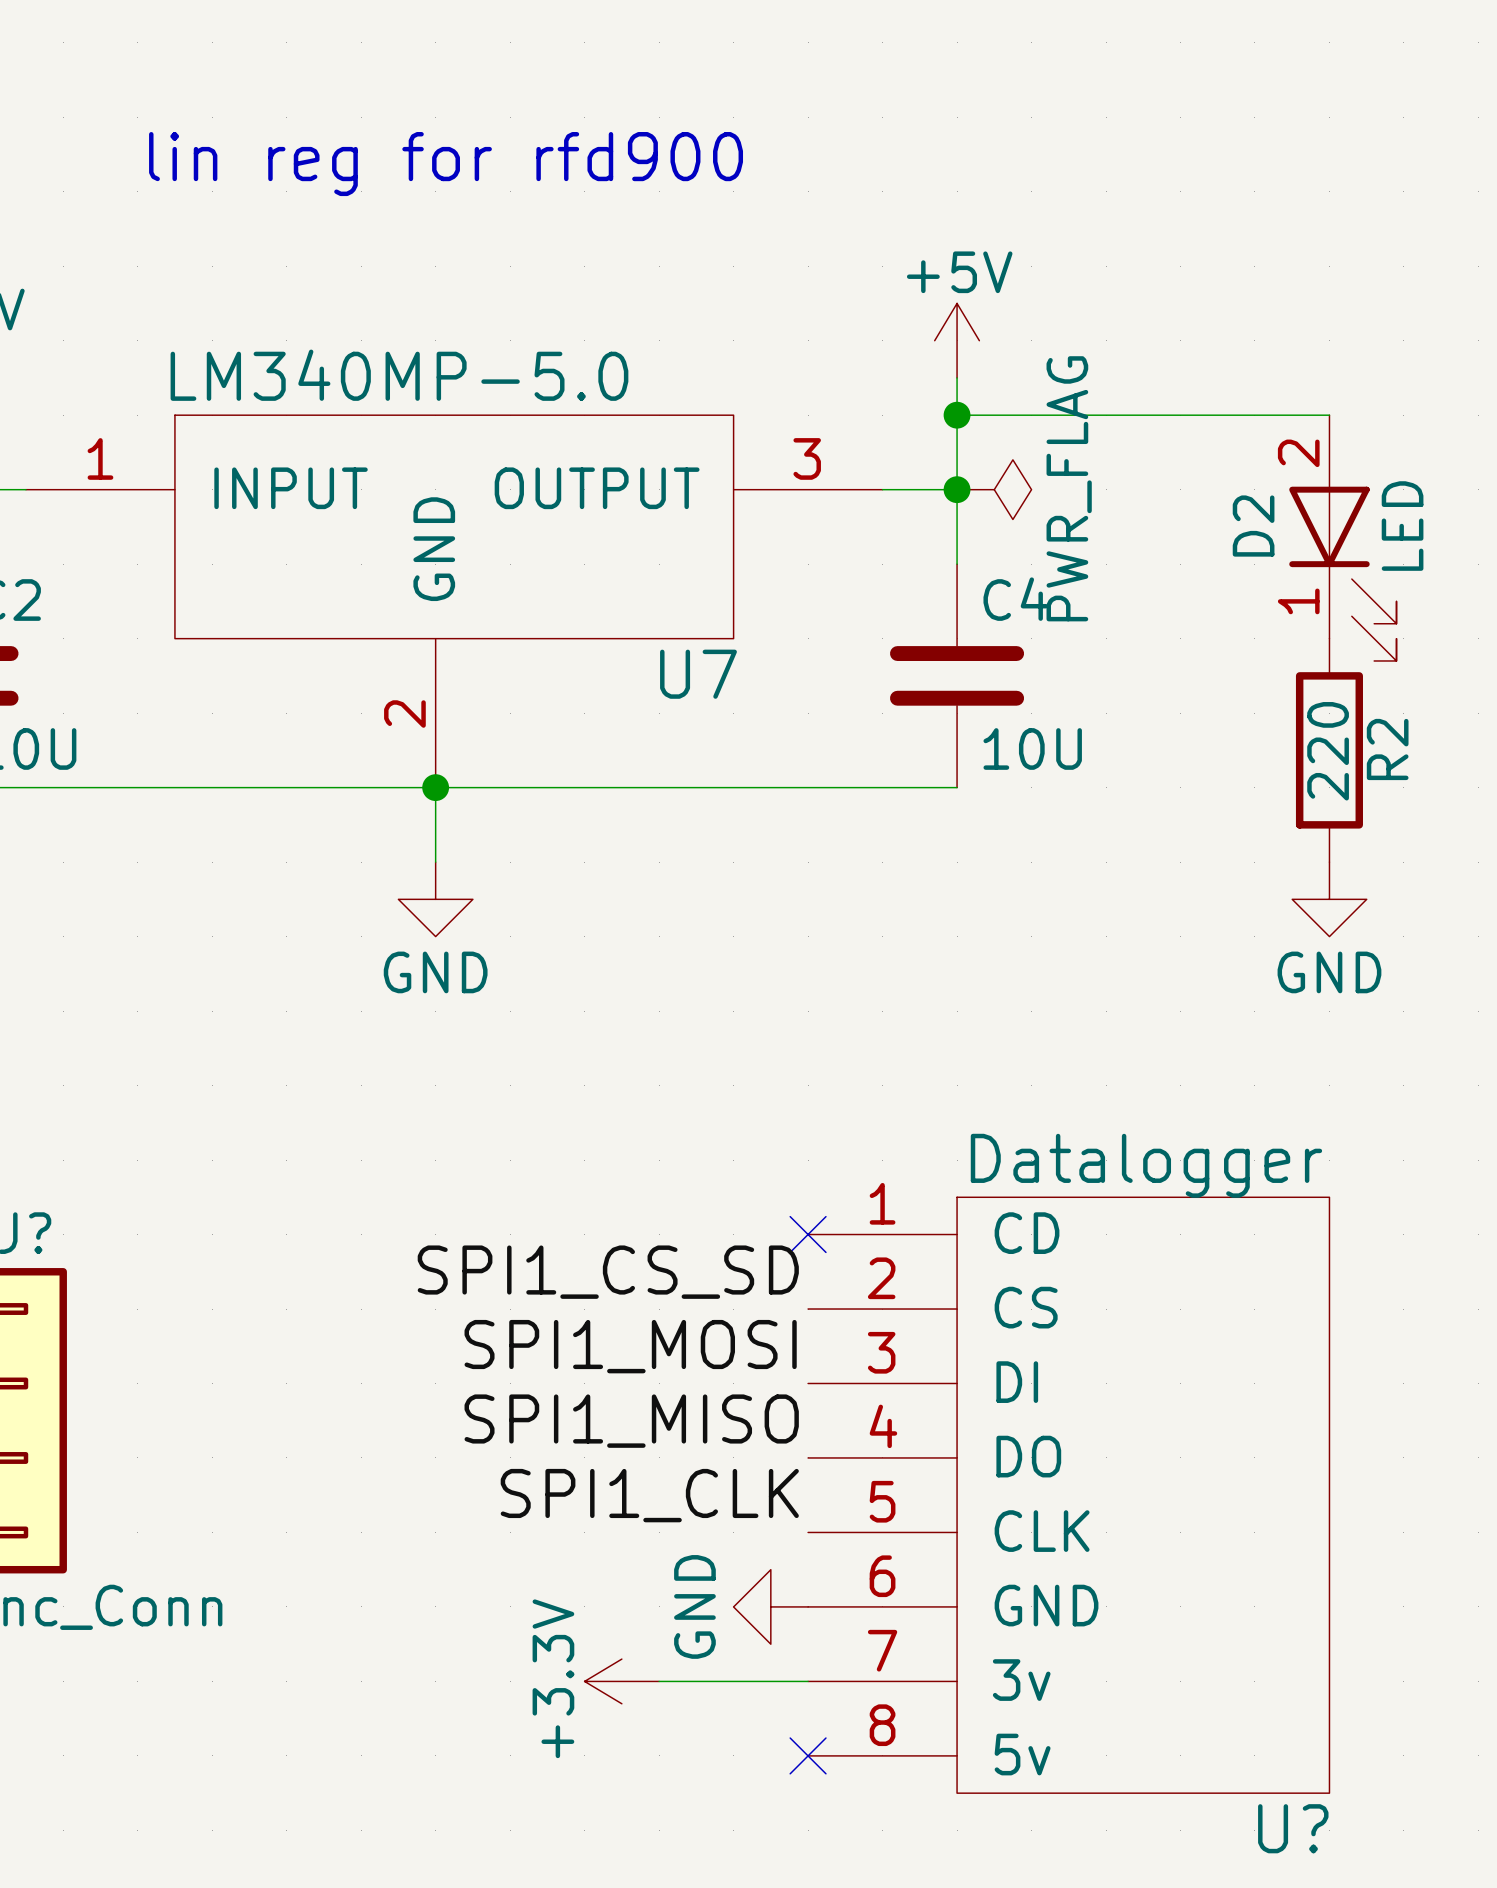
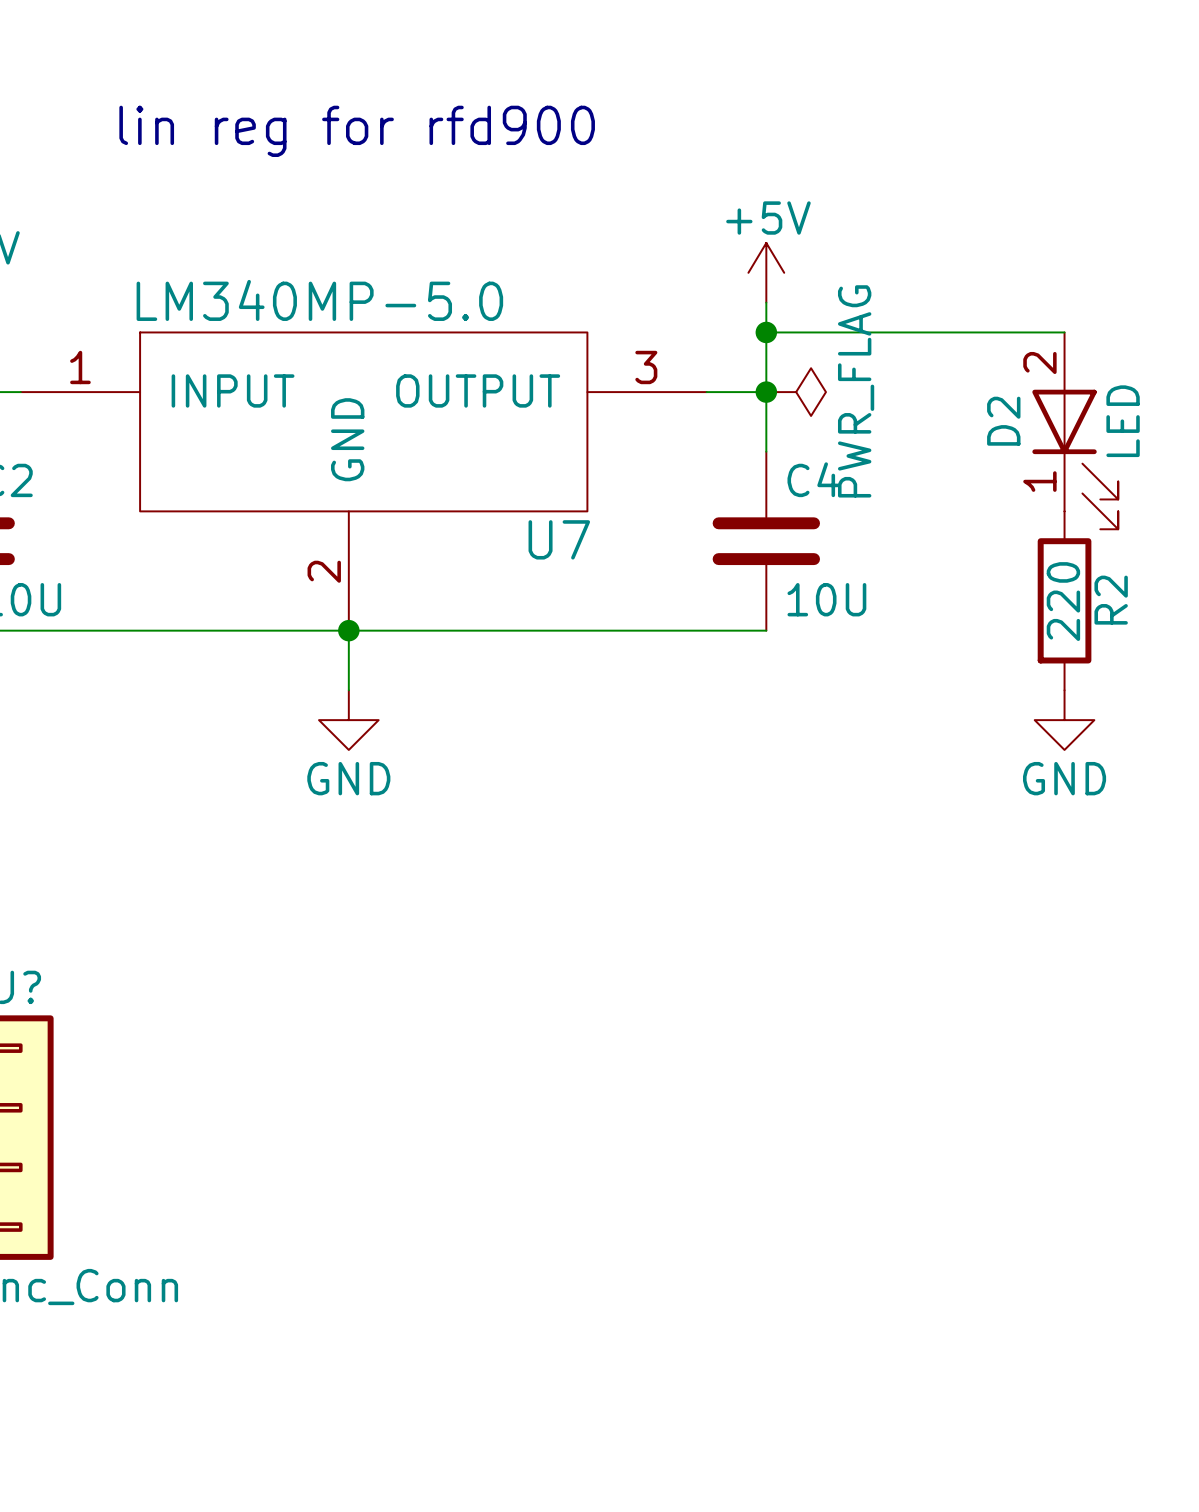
no-connect mark: (808, 1234) -> none
label: SPI1_CS_SD (608, 1272) -> none
label: SPI1_MOSI (630, 1346) -> none
label: SPI1_MISO (631, 1421) -> none
label: SPI1_CLK (649, 1495) -> none
U?: Datalogger (1068, 1495) -> none
power symbol: GND (770, 1606) -> none
power symbol: +3.3V (621, 1681) -> none
wire: (659, 1681) (808, 1681) -> none
no-connect mark: (808, 1755) -> none

